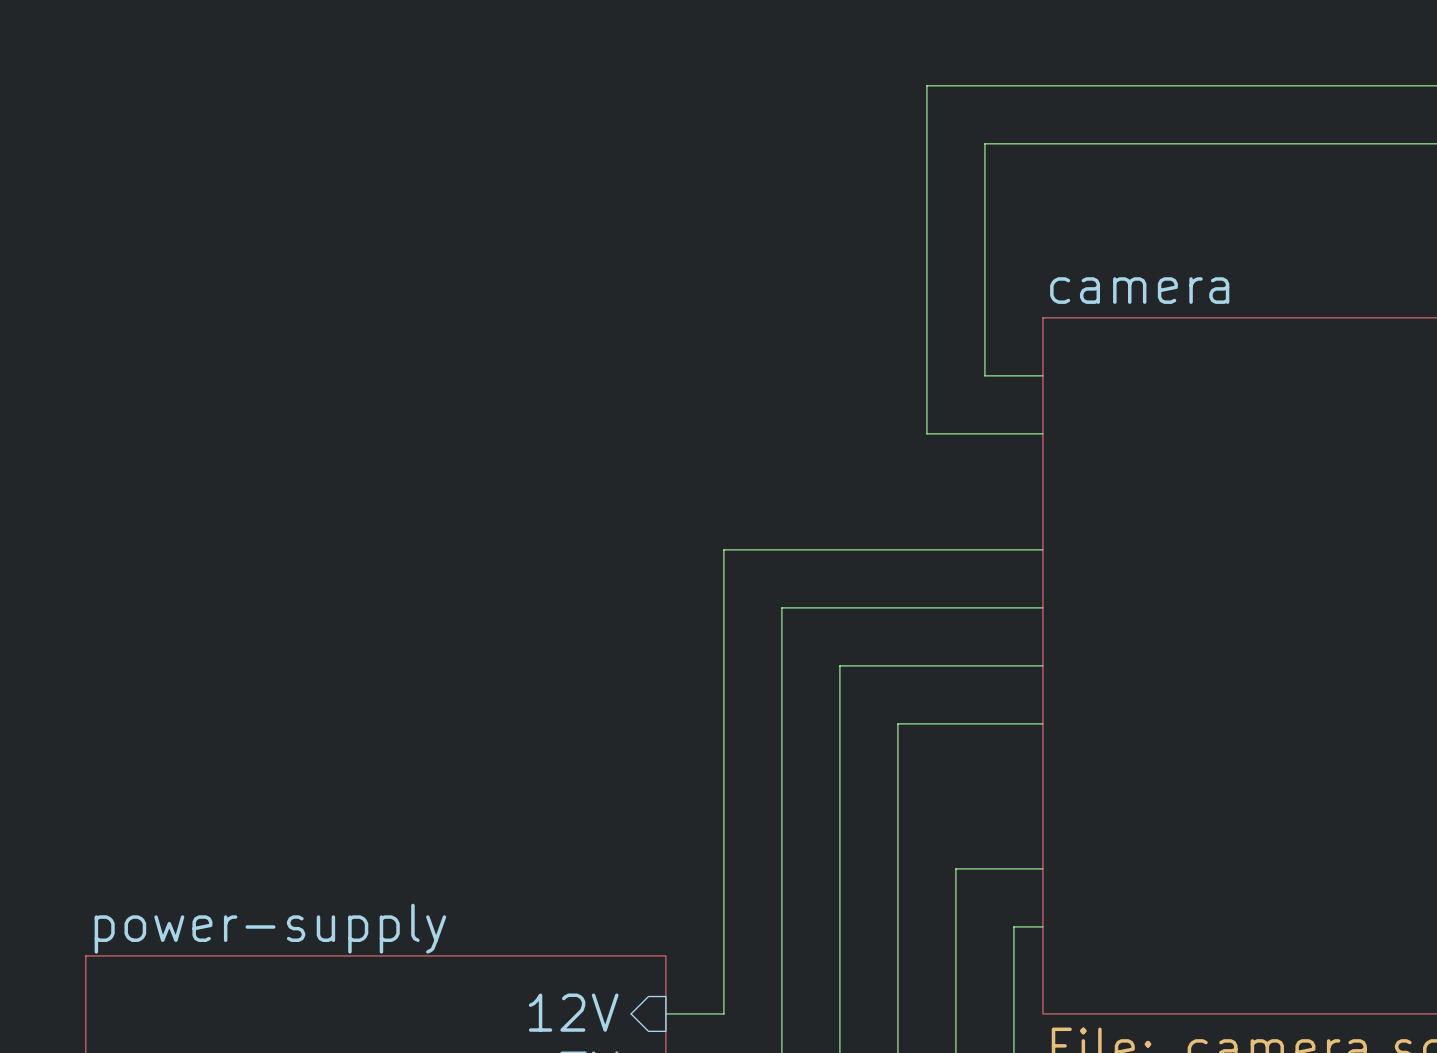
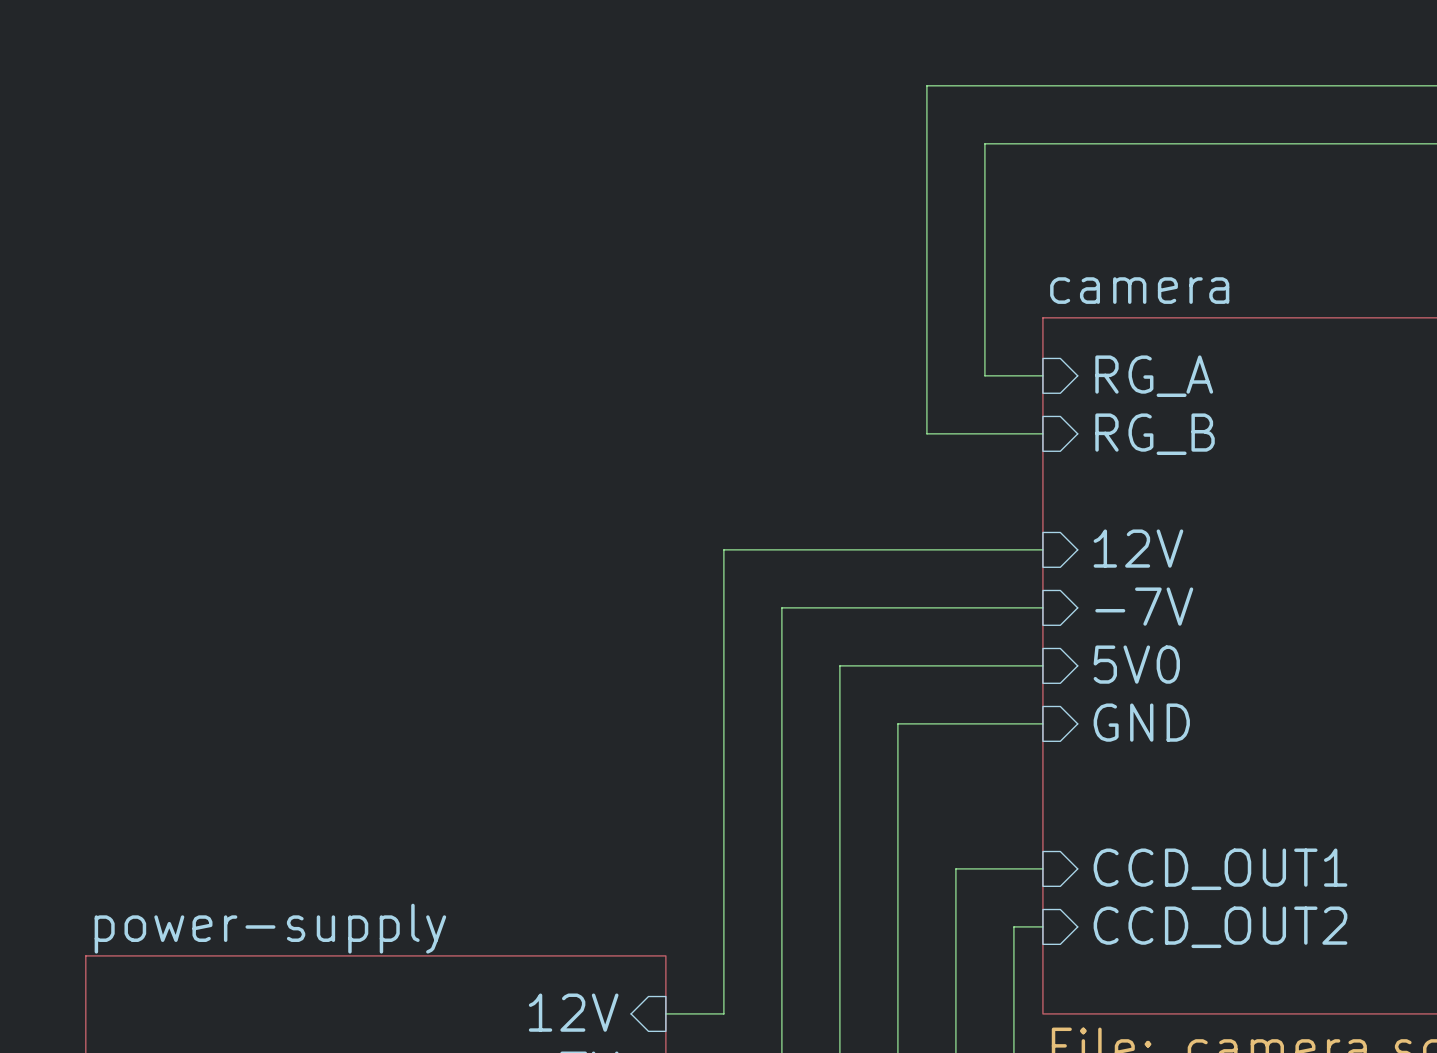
sheet pin: none -> RG_A (1154, 376)
sheet pin: none -> RG_B (1155, 434)
sheet pin: none -> 12V (1138, 548)
sheet pin: none -> -7V (1144, 606)
sheet pin: none -> 5V0 (1136, 664)
sheet pin: none -> GND (1141, 722)
sheet pin: none -> CCD_OUT1 (1220, 869)
sheet pin: none -> CCD_OUT2 (1220, 927)

